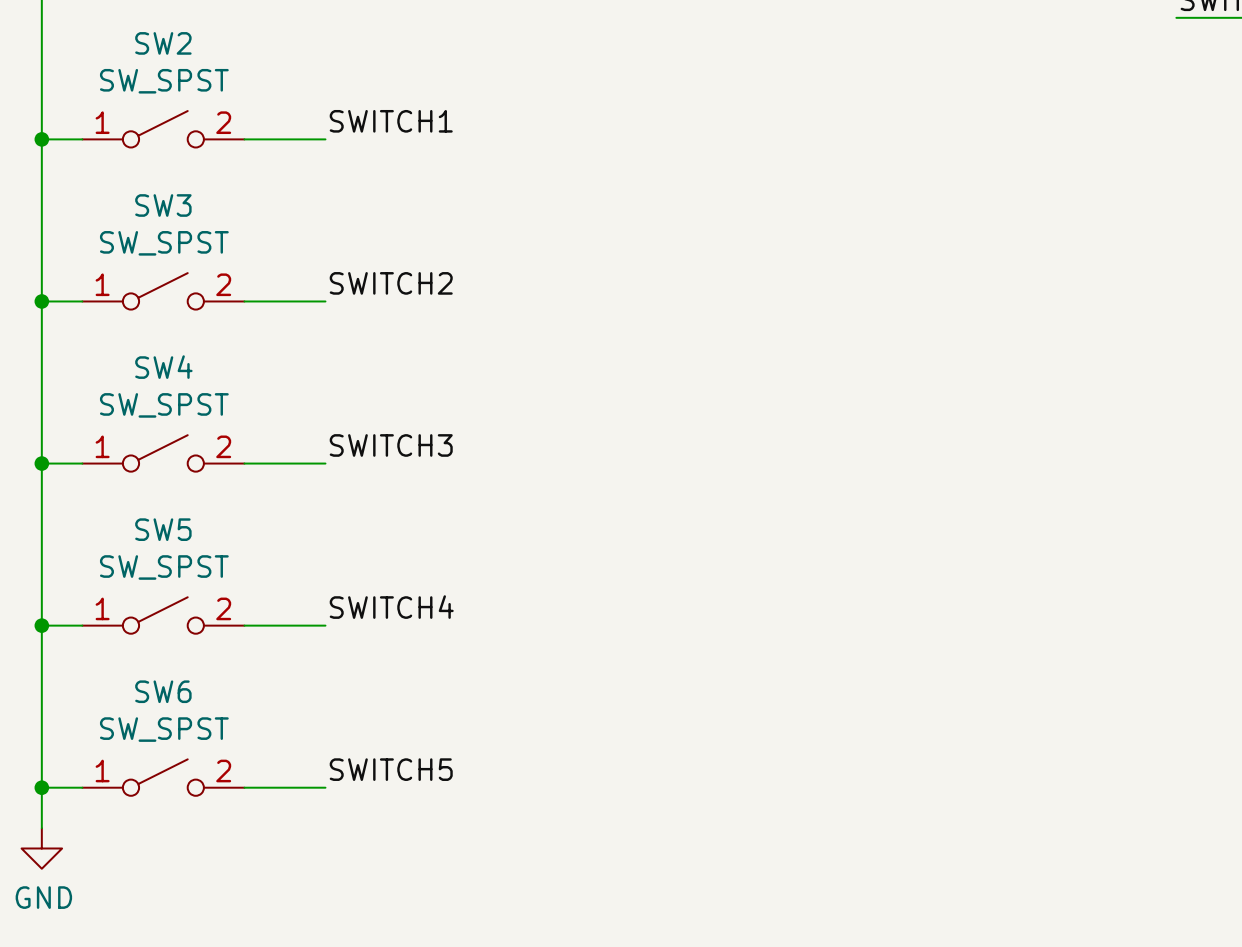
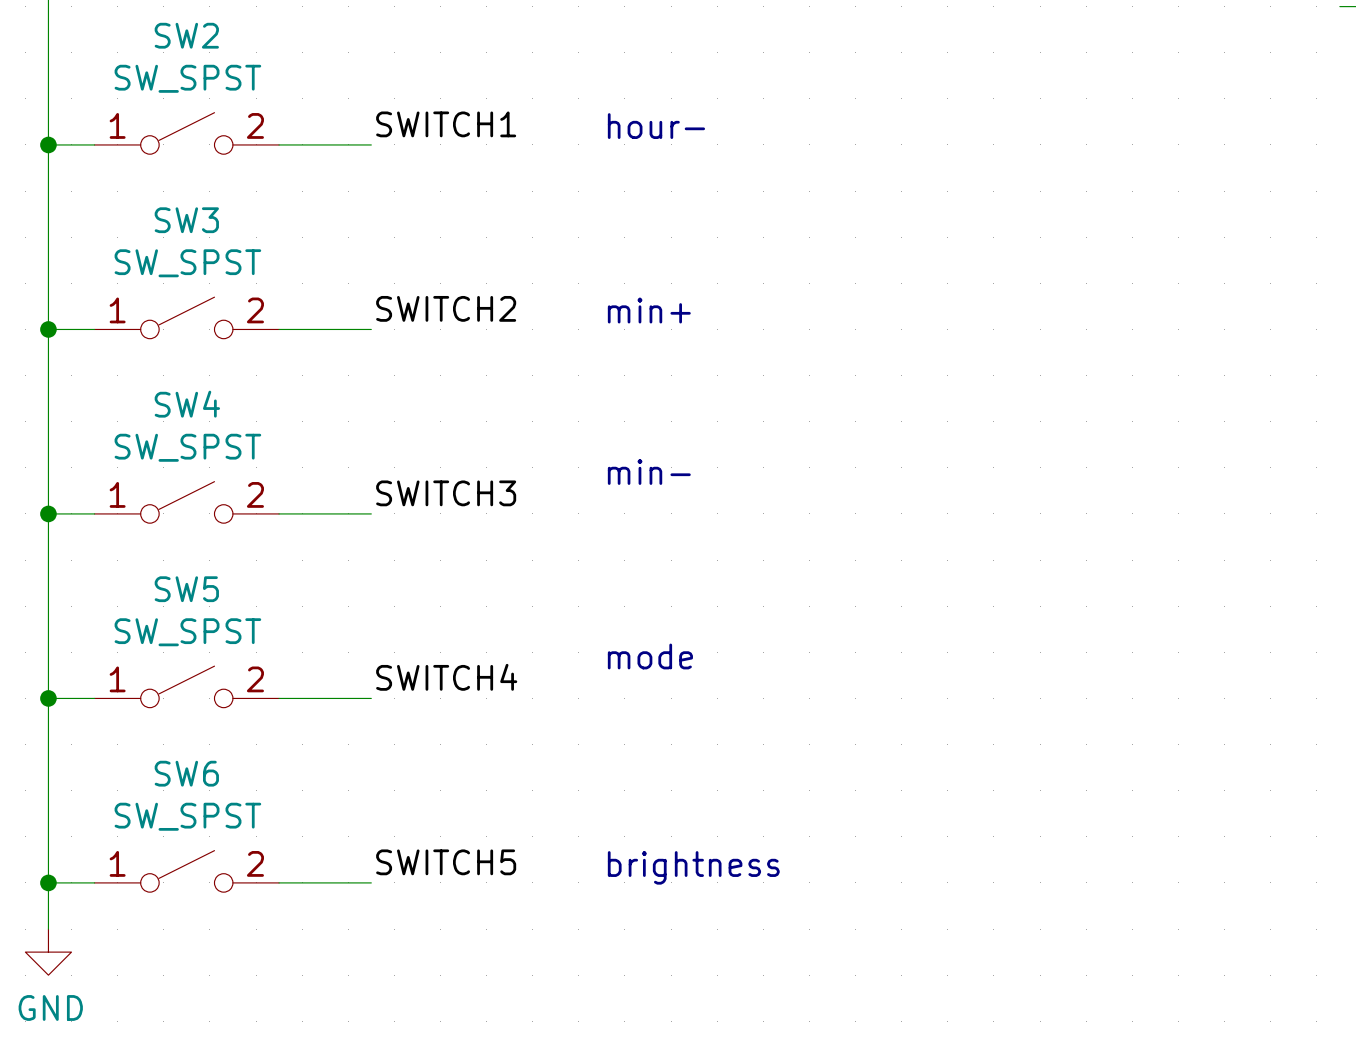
text: none -> hour- (656, 126)
text: none -> min+ (649, 310)
text: none -> min- (649, 471)
text: none -> mode (650, 656)
text: none -> brightness (693, 867)

